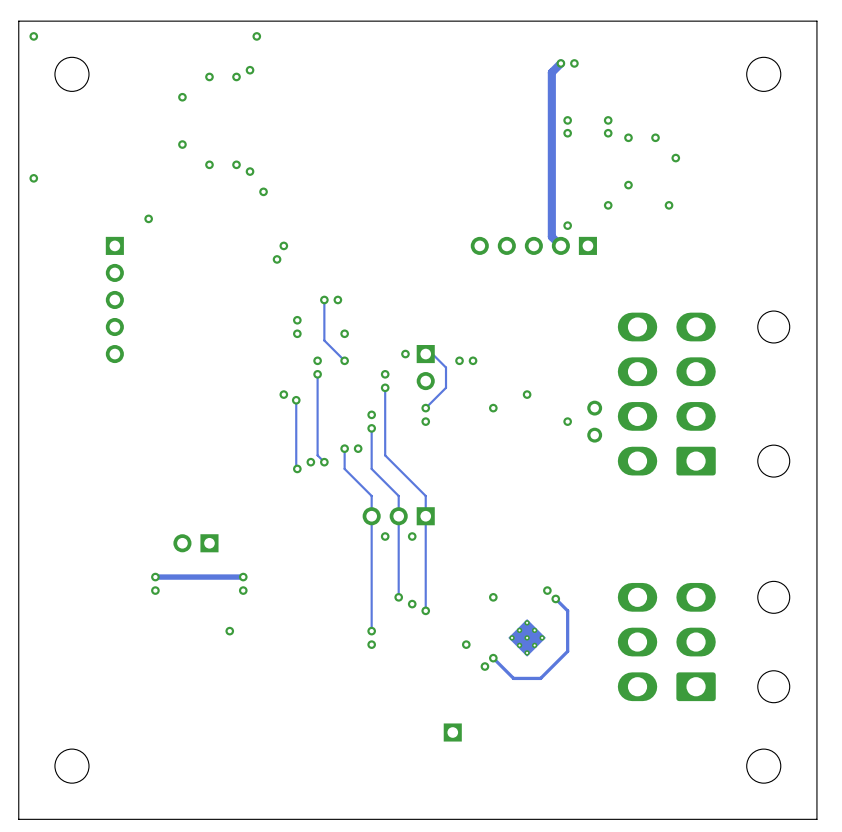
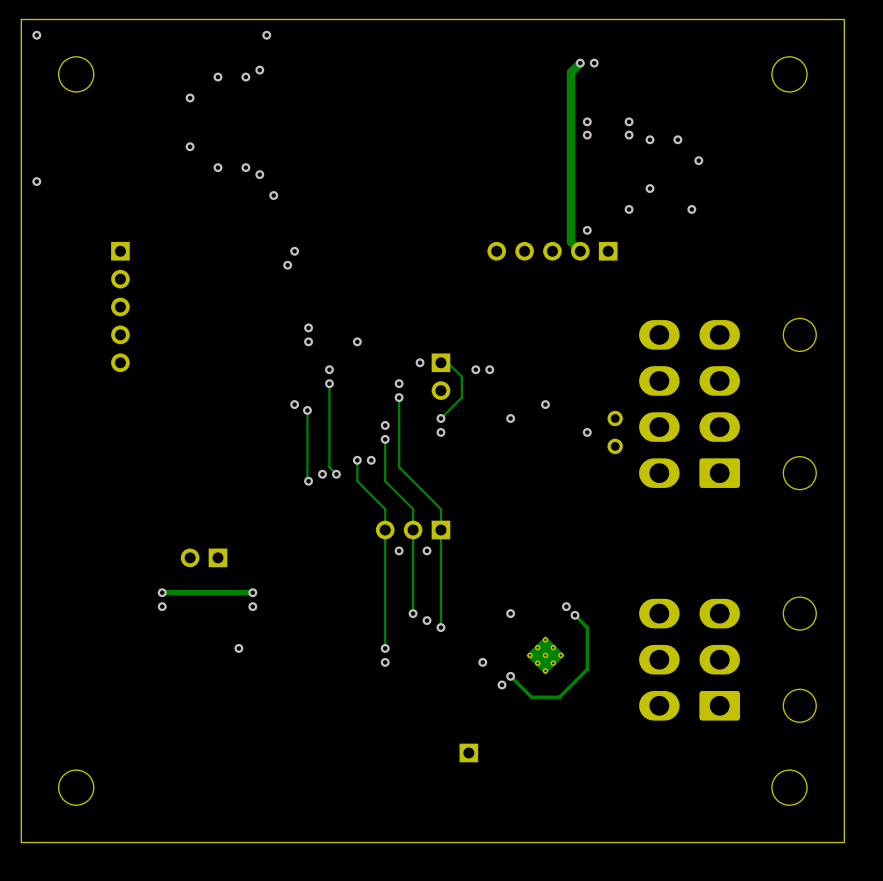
via: (148, 218) -> none
track: (324, 299) (324, 340) (344, 360) -> none
via: (324, 299) -> none
via: (337, 299) -> none
via: (344, 360) -> none

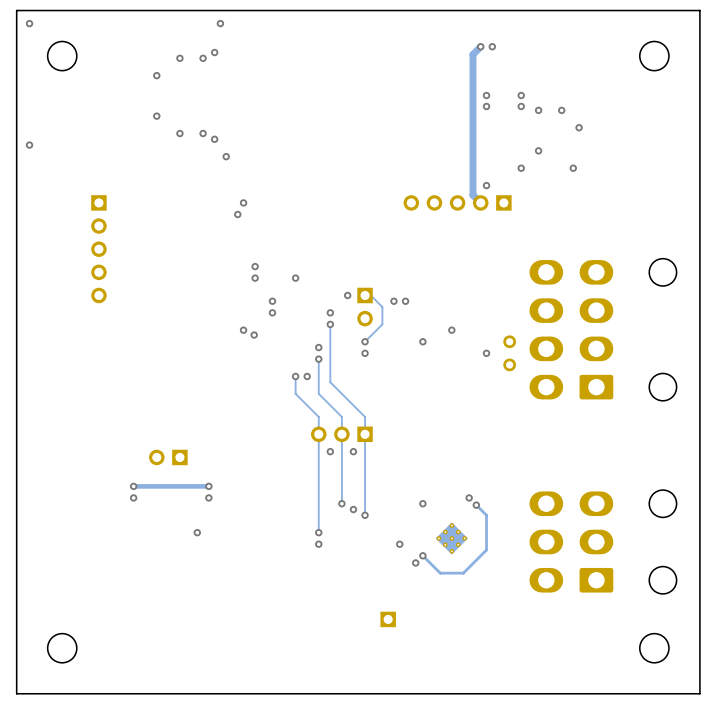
track: (329, 383) (329, 467) (336, 474) -> none
track: (307, 410) (308, 481) -> none
via: (322, 474) -> none
via: (336, 474) -> none
via: (308, 481) -> none

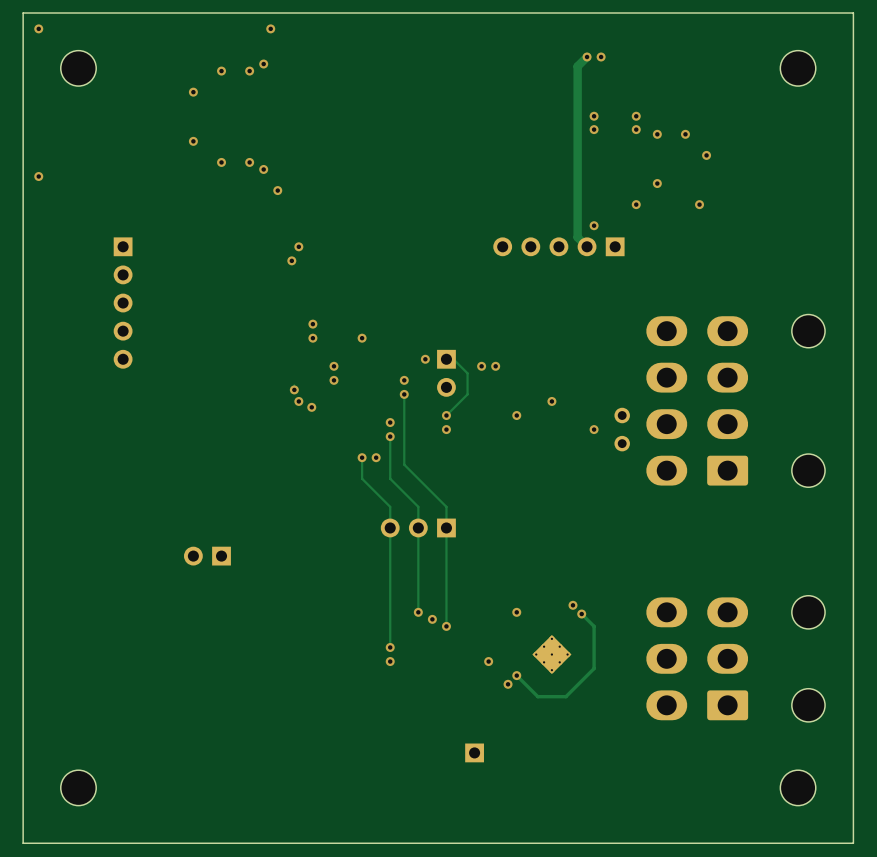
via: none -> (294, 389)
via: (330, 451) -> none
via: (353, 451) -> none
via: (133, 486) -> none
track: (208, 486) (133, 486) -> none
via: (208, 486) -> none
via: (133, 497) -> none
via: (208, 497) -> none
via: (197, 532) -> none

